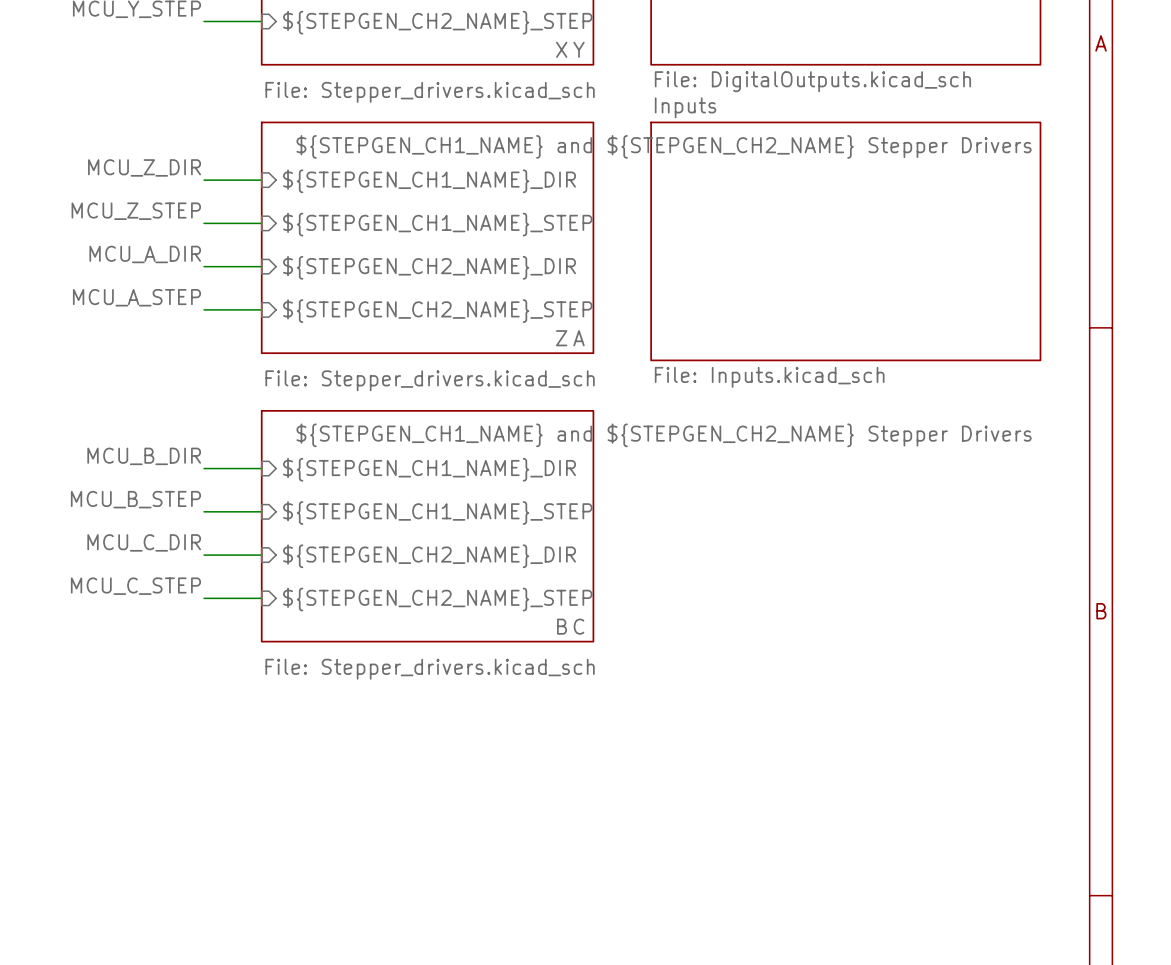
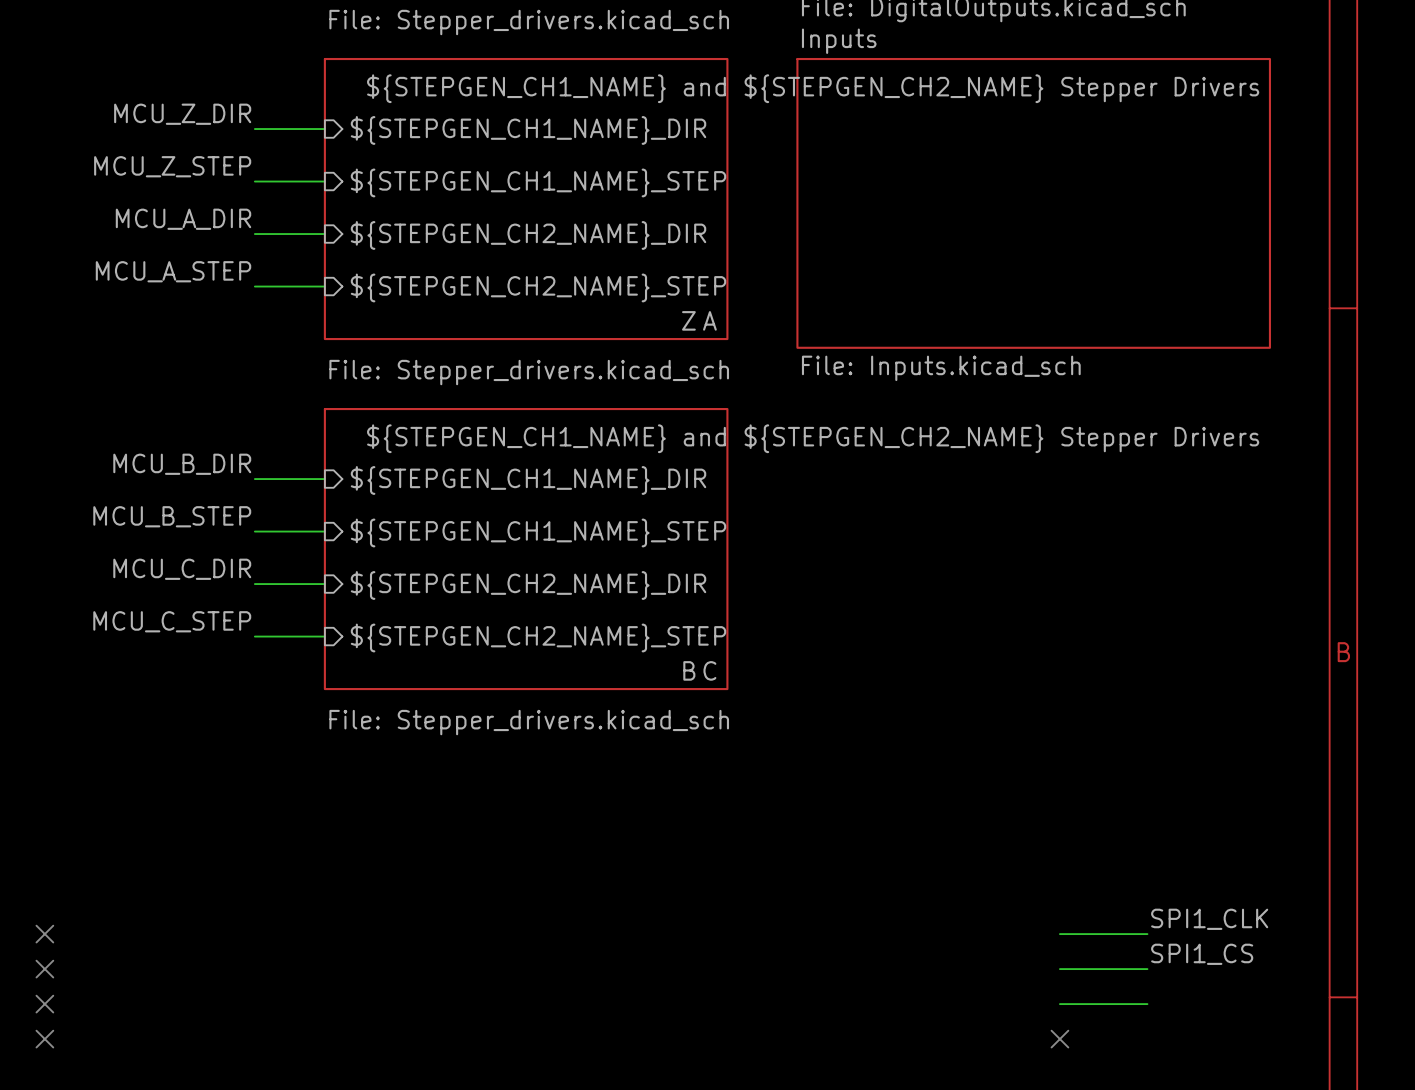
label: none -> SPI1_CLK (1209, 919)
no-connect mark: none -> (44, 934)
wire: none -> (1059, 934) (1147, 934)
label: none -> SPI1_CS (1202, 954)
no-connect mark: none -> (44, 969)
wire: none -> (1059, 969) (1147, 969)
no-connect mark: none -> (44, 1004)
wire: none -> (1059, 1004) (1147, 1004)
no-connect mark: none -> (44, 1039)
no-connect mark: none -> (1059, 1039)

